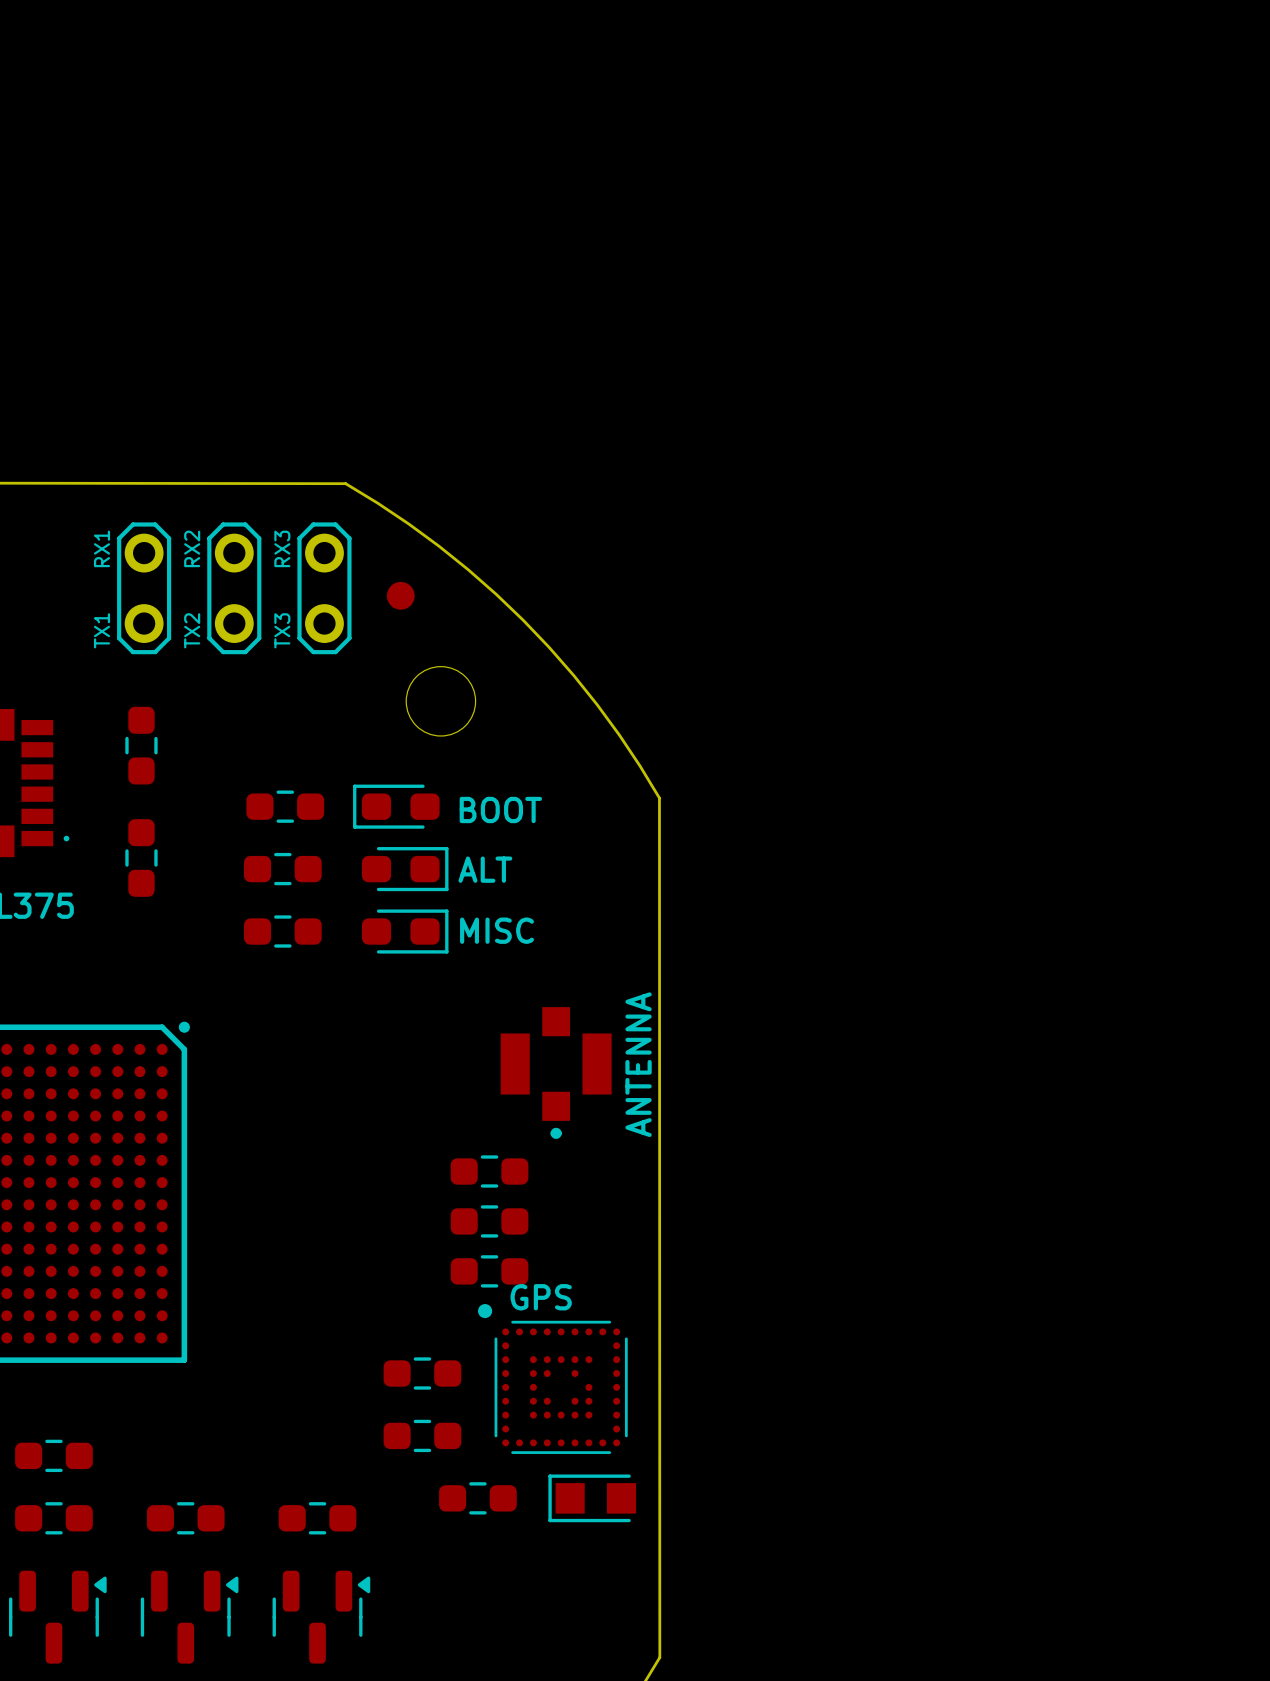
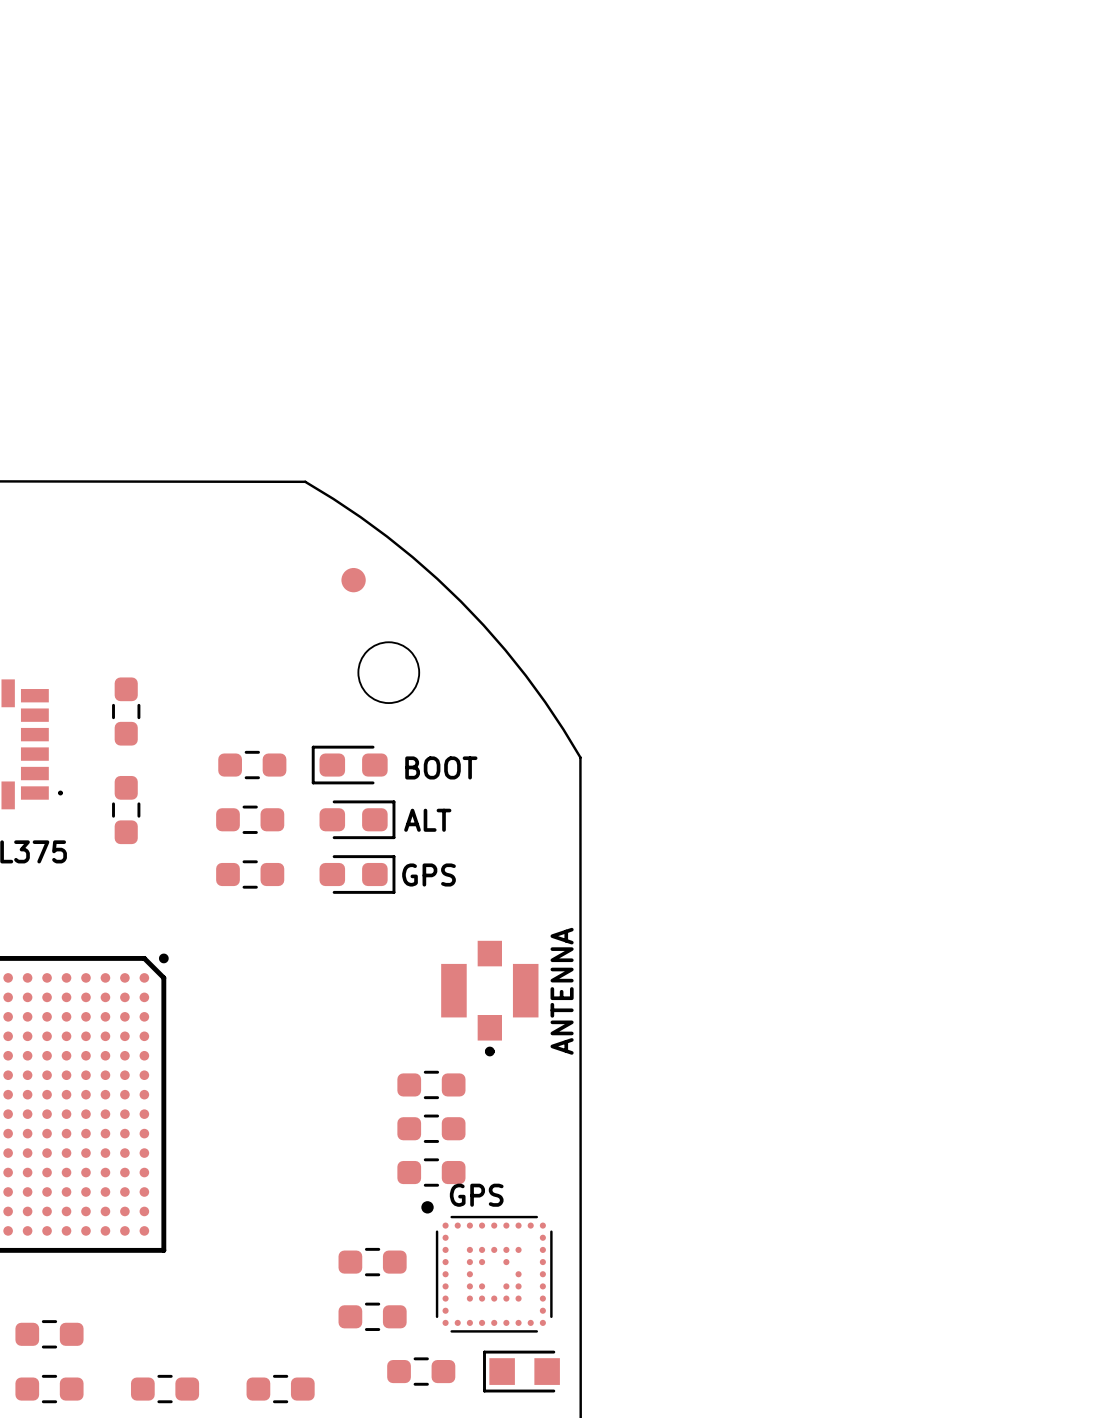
part: (144, 588) -> none
part: (234, 588) -> none
part: (324, 588) -> none
text: TX1 RX1 (102, 589) -> none
text: TX2 RX2 (192, 589) -> none
text: TX3 RX3 (282, 589) -> none
text: MISC (497, 930) -> GPS (429, 875)

